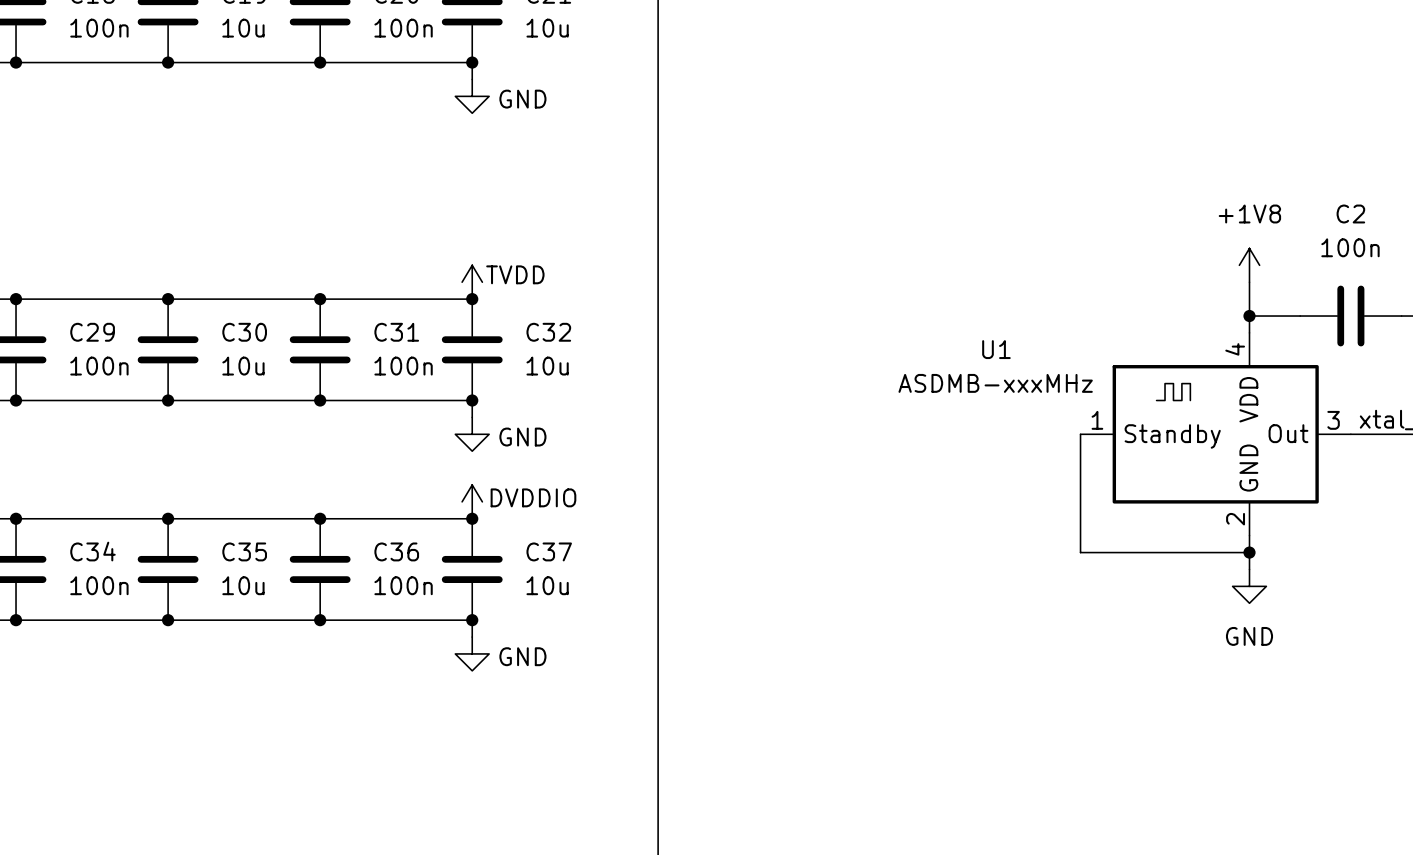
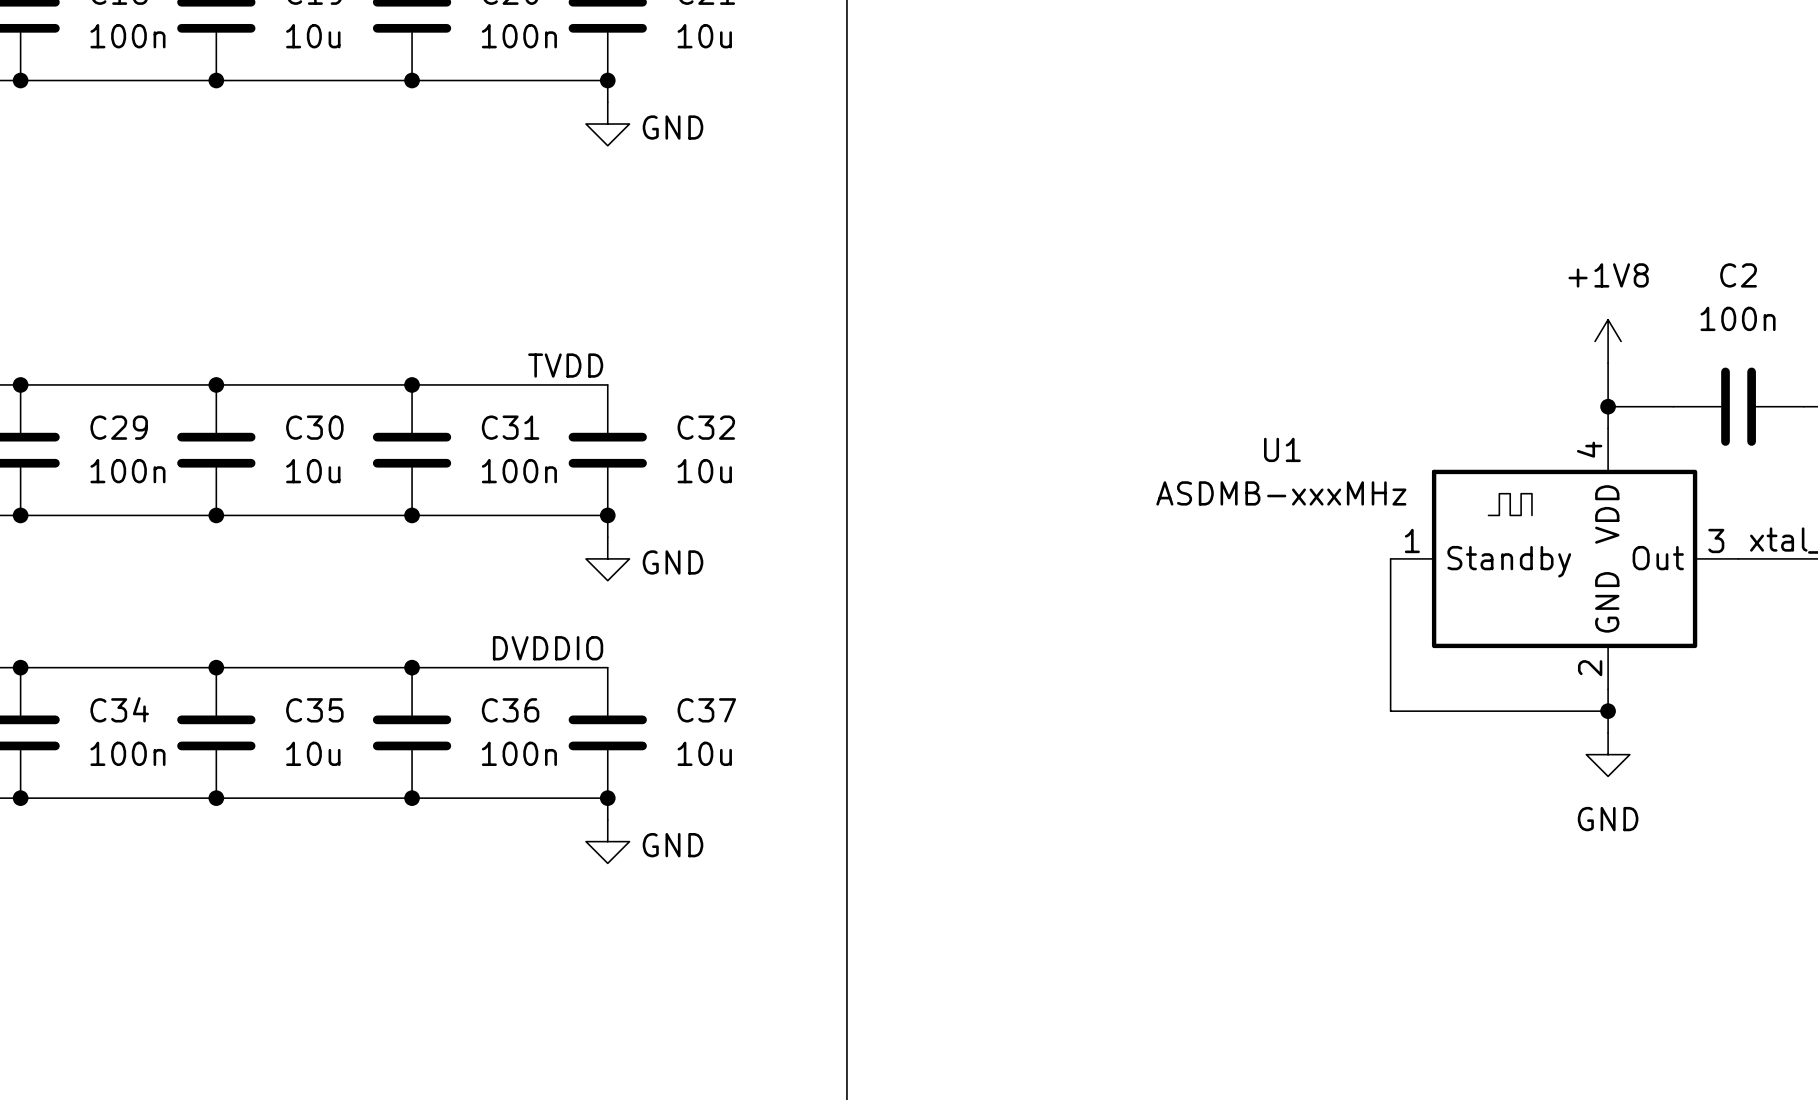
power symbol: TVDD (472, 282) -> none
label: none -> TVDD (565, 365)
junction: (472, 299) -> none
power symbol: DVDDIO (472, 501) -> none
label: none -> DVDDIO (548, 648)
junction: (472, 518) -> none

